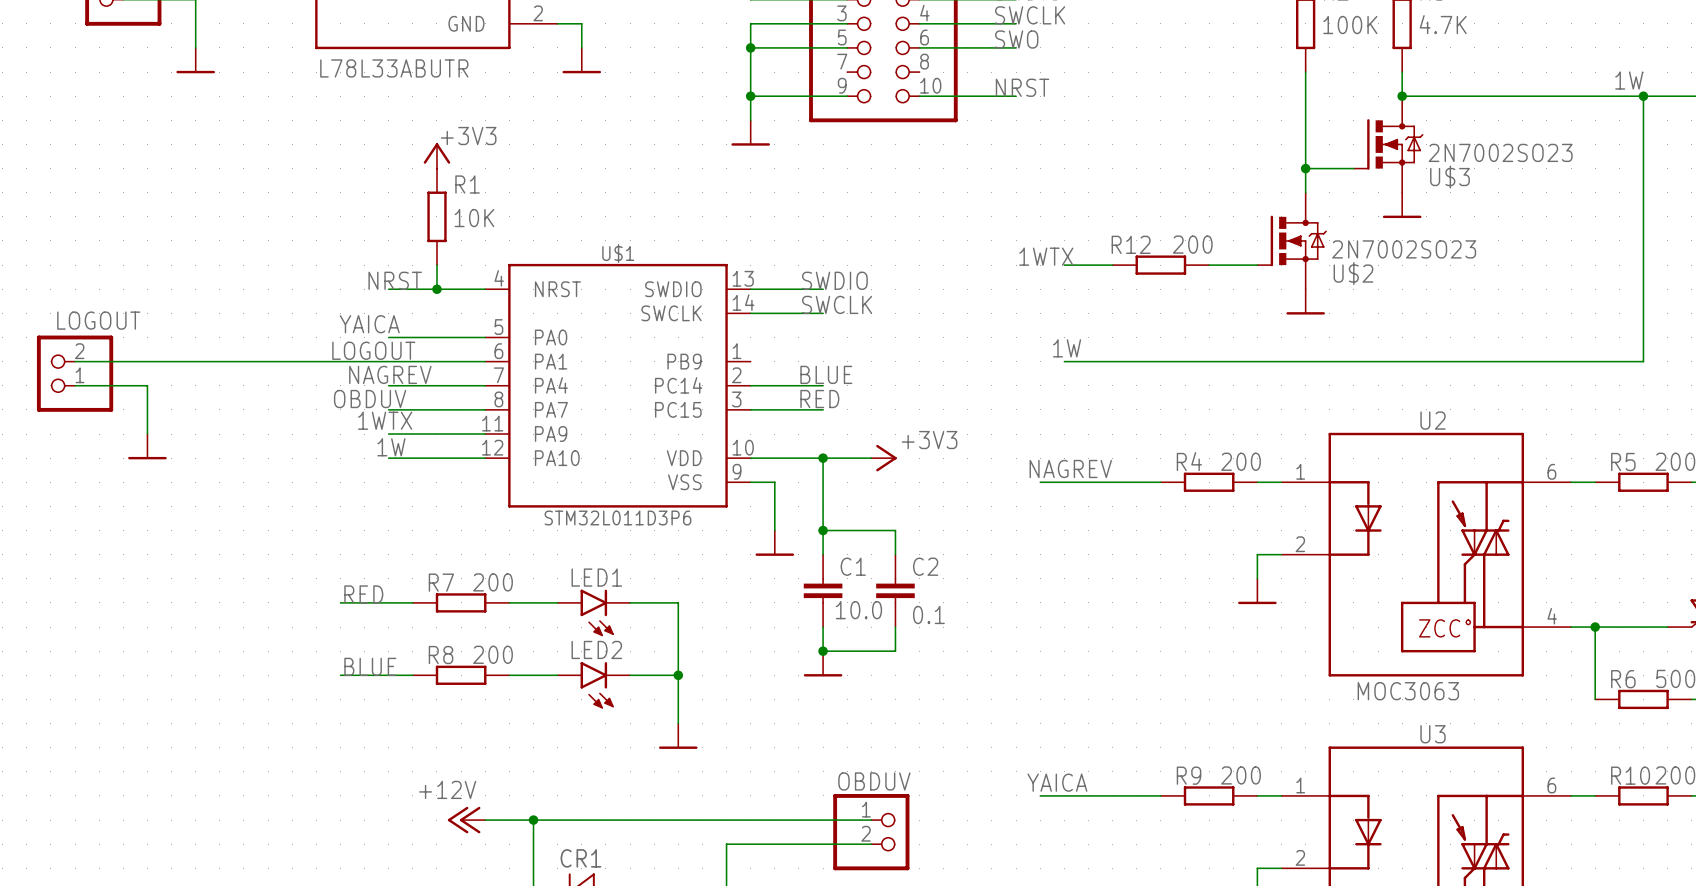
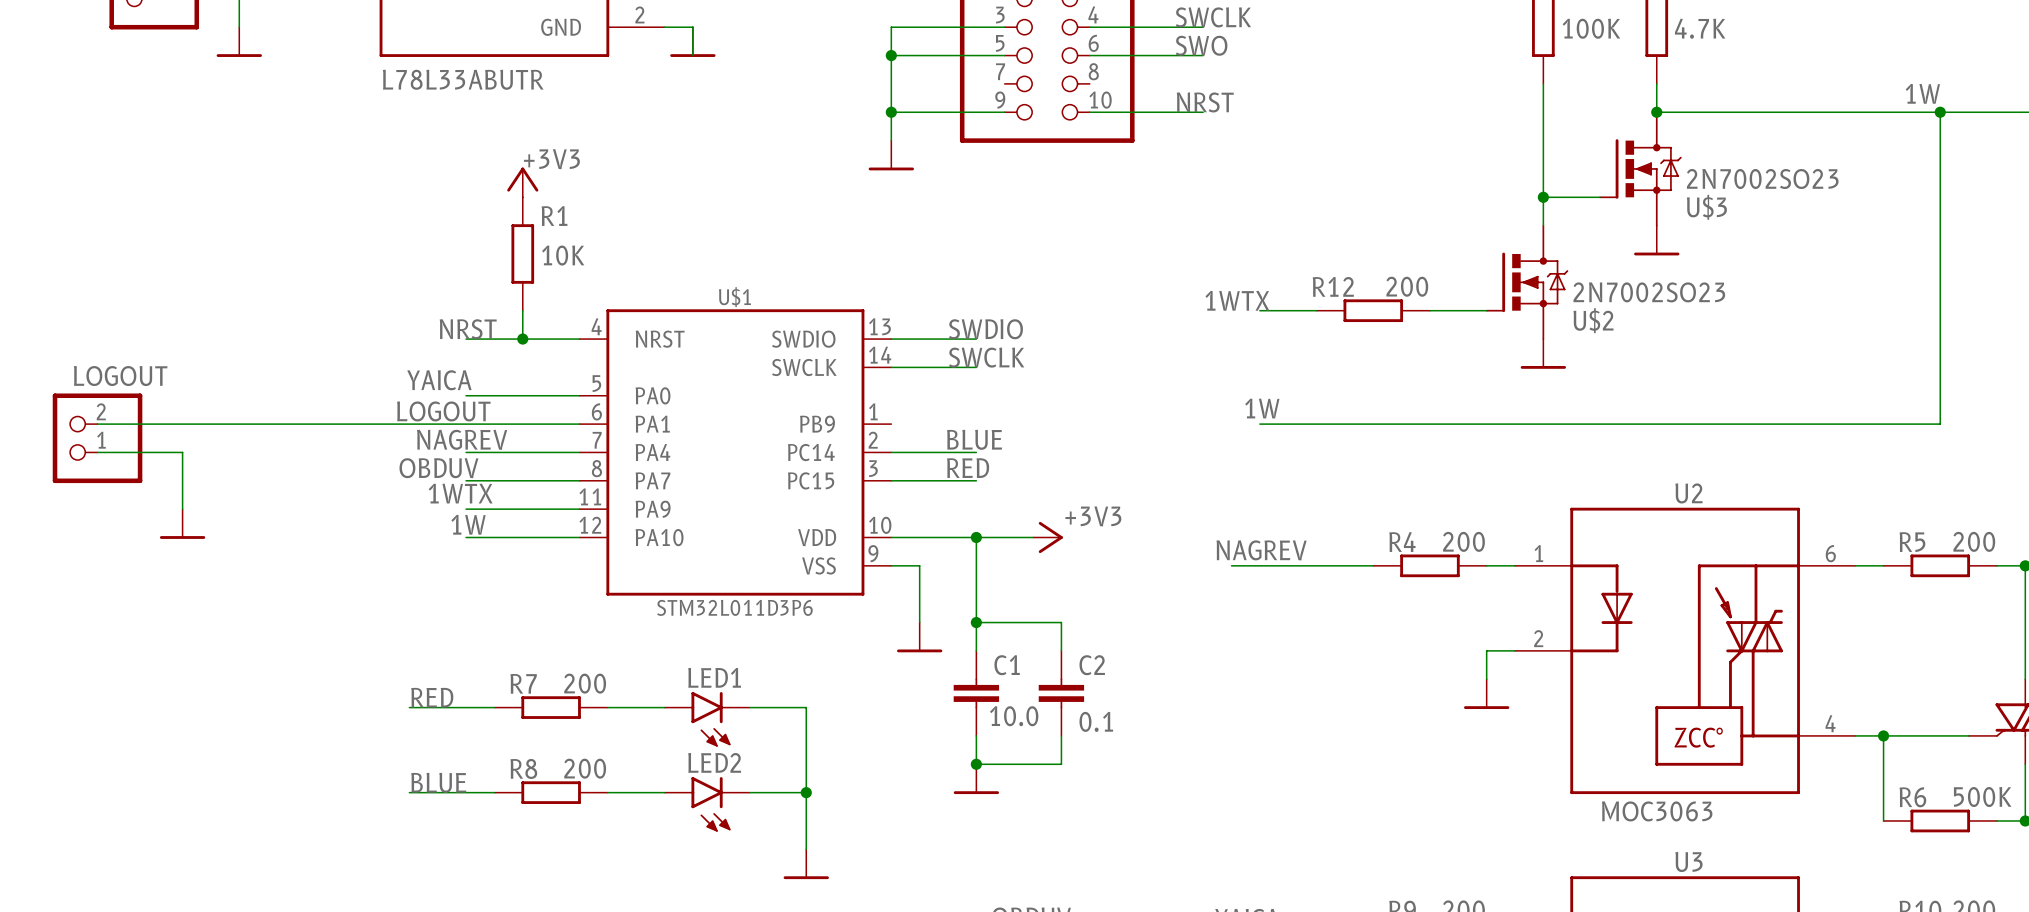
power symbol position: (195, 60) -> (239, 42)
power symbol position: (581, 60) -> (692, 42)

